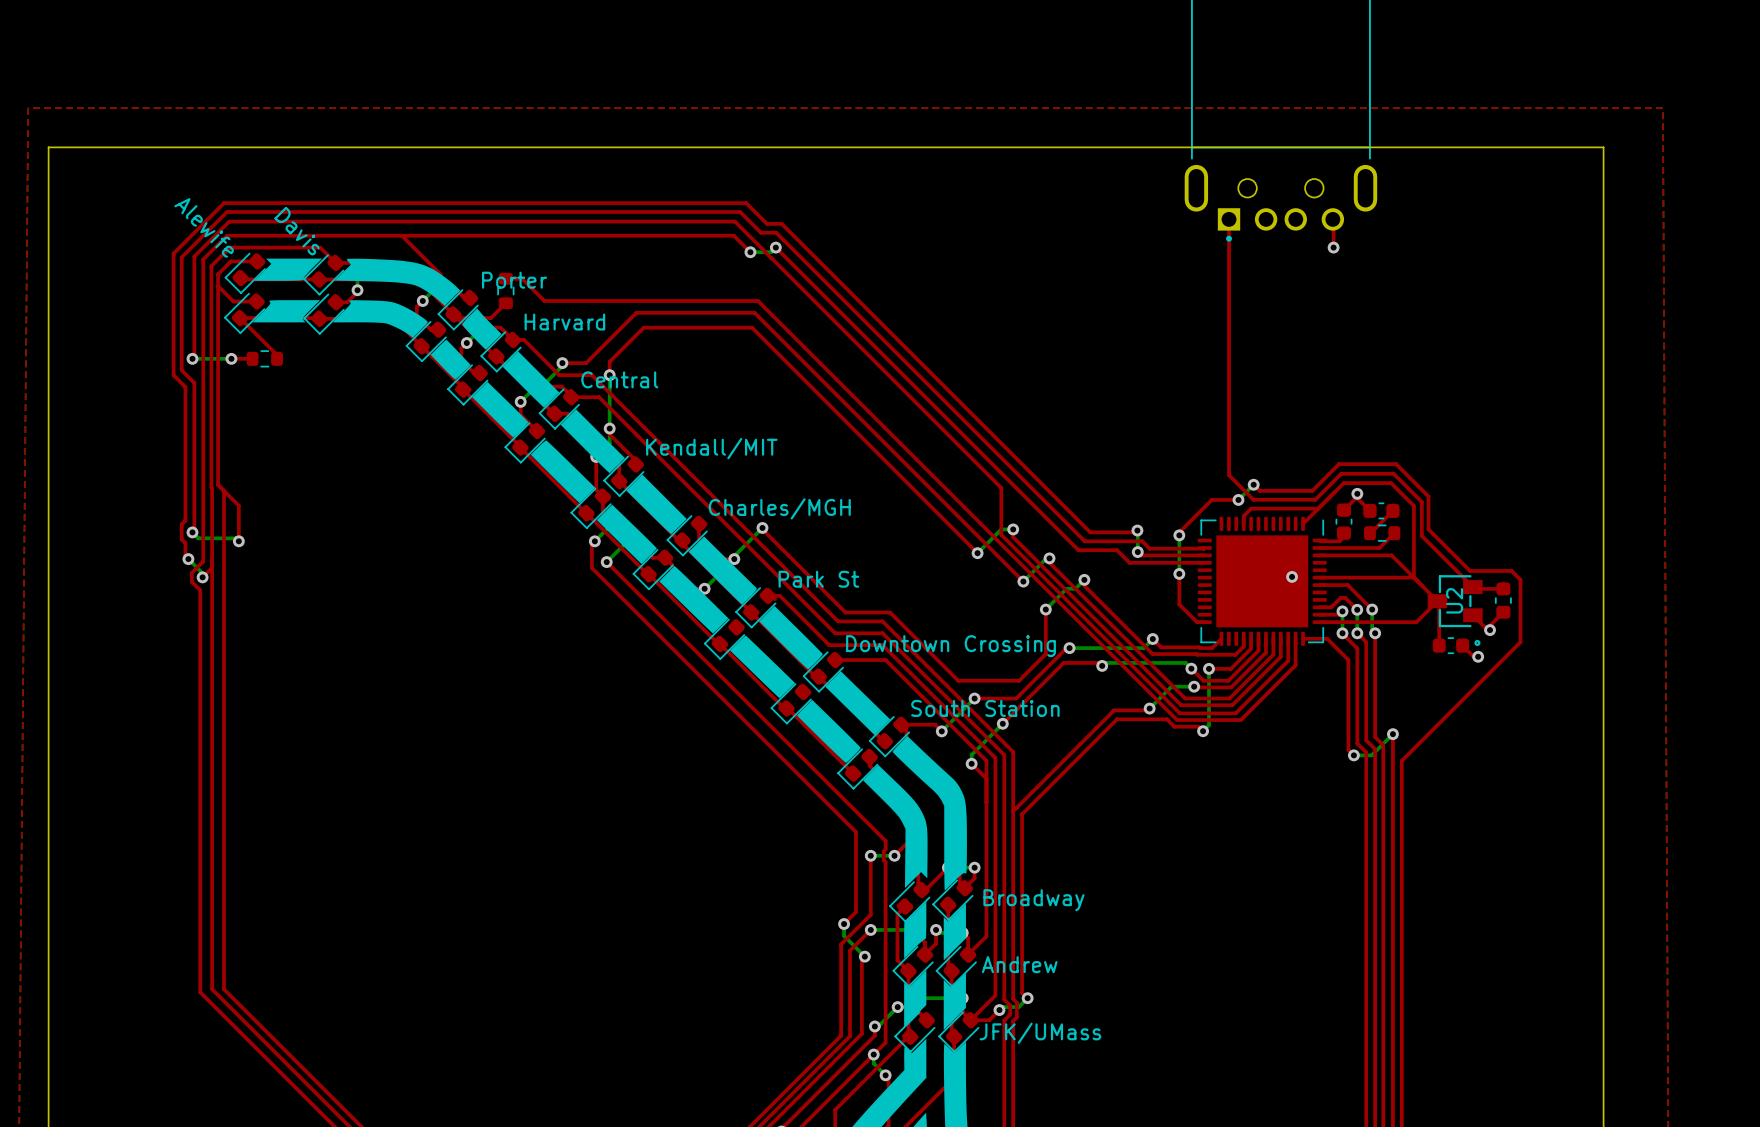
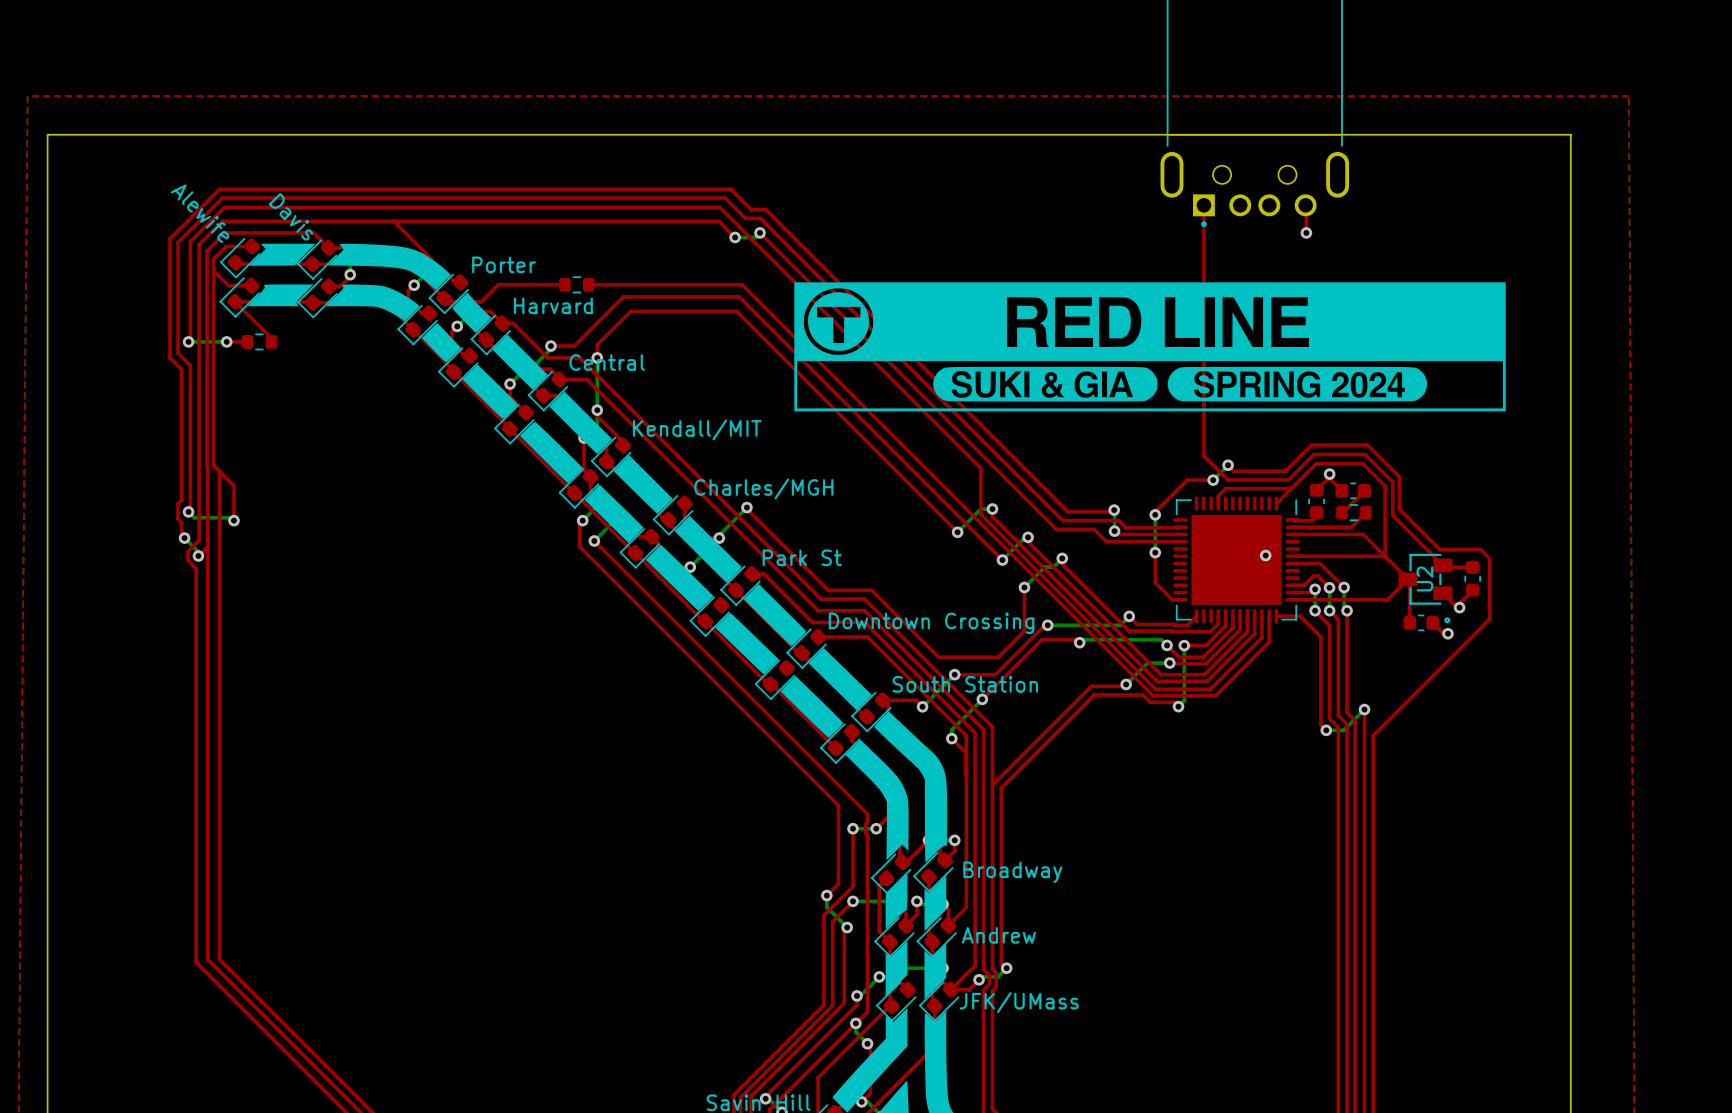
top track: (505, 278) (522, 278) (544, 300) (758, 300) -> (588, 284) (742, 285)
part rotation: 0° (505, 290) -> 90° clockwise (576, 284)
part position: (505, 290) -> (576, 284)
drawing: none -> [794, 282, 1506, 412]
top track: none -> (564, 284) (498, 284) (495, 287)

